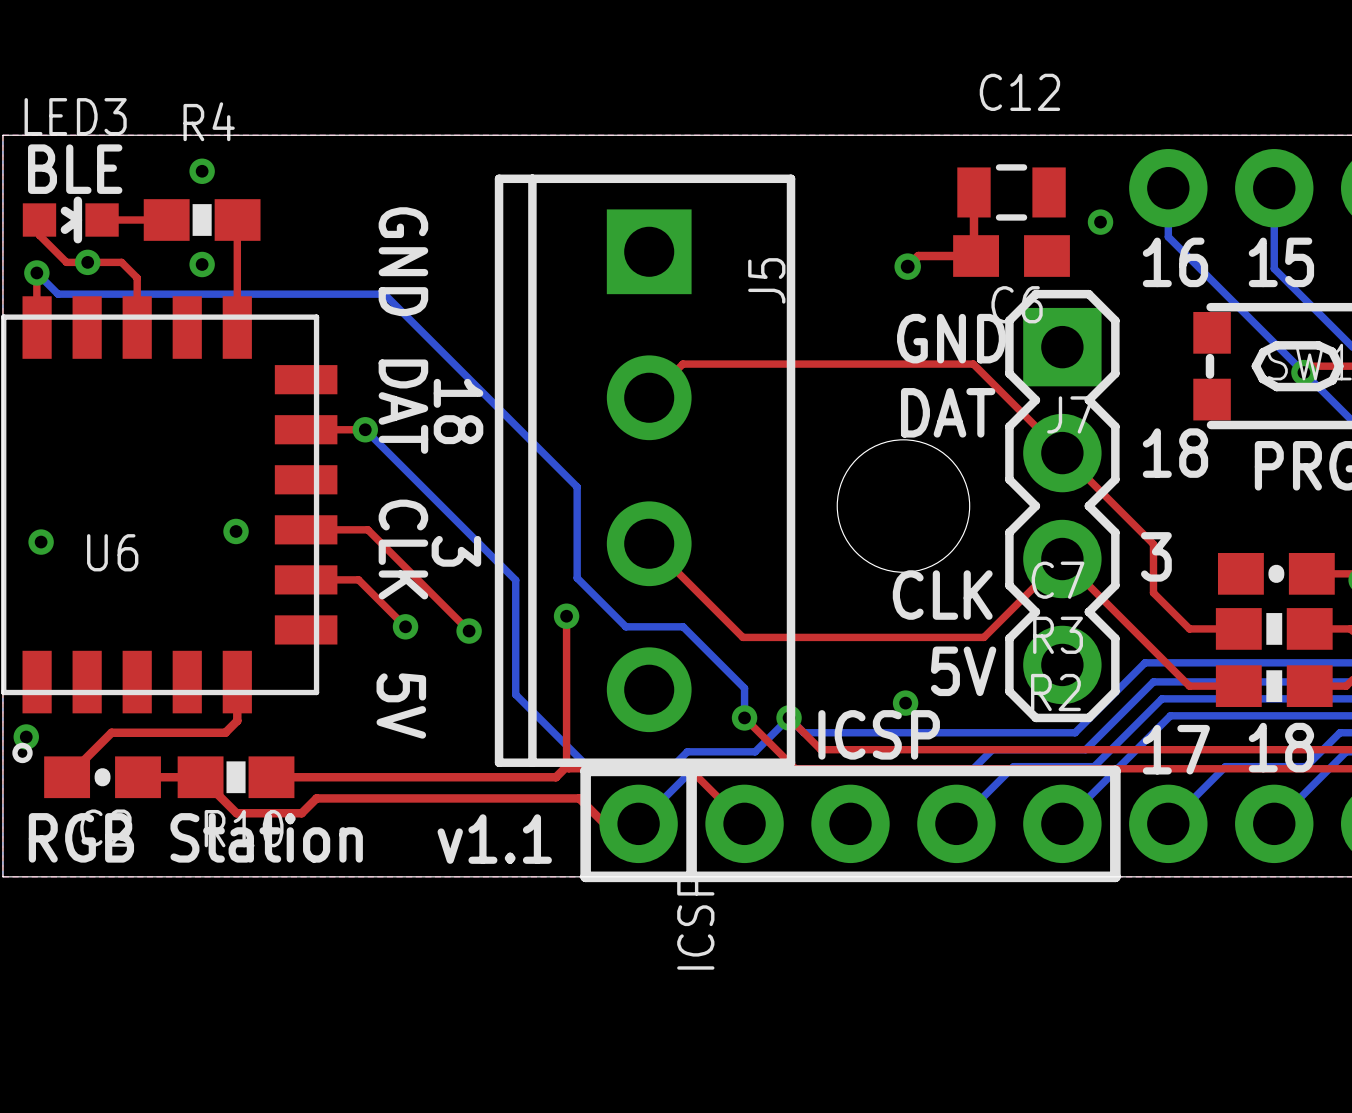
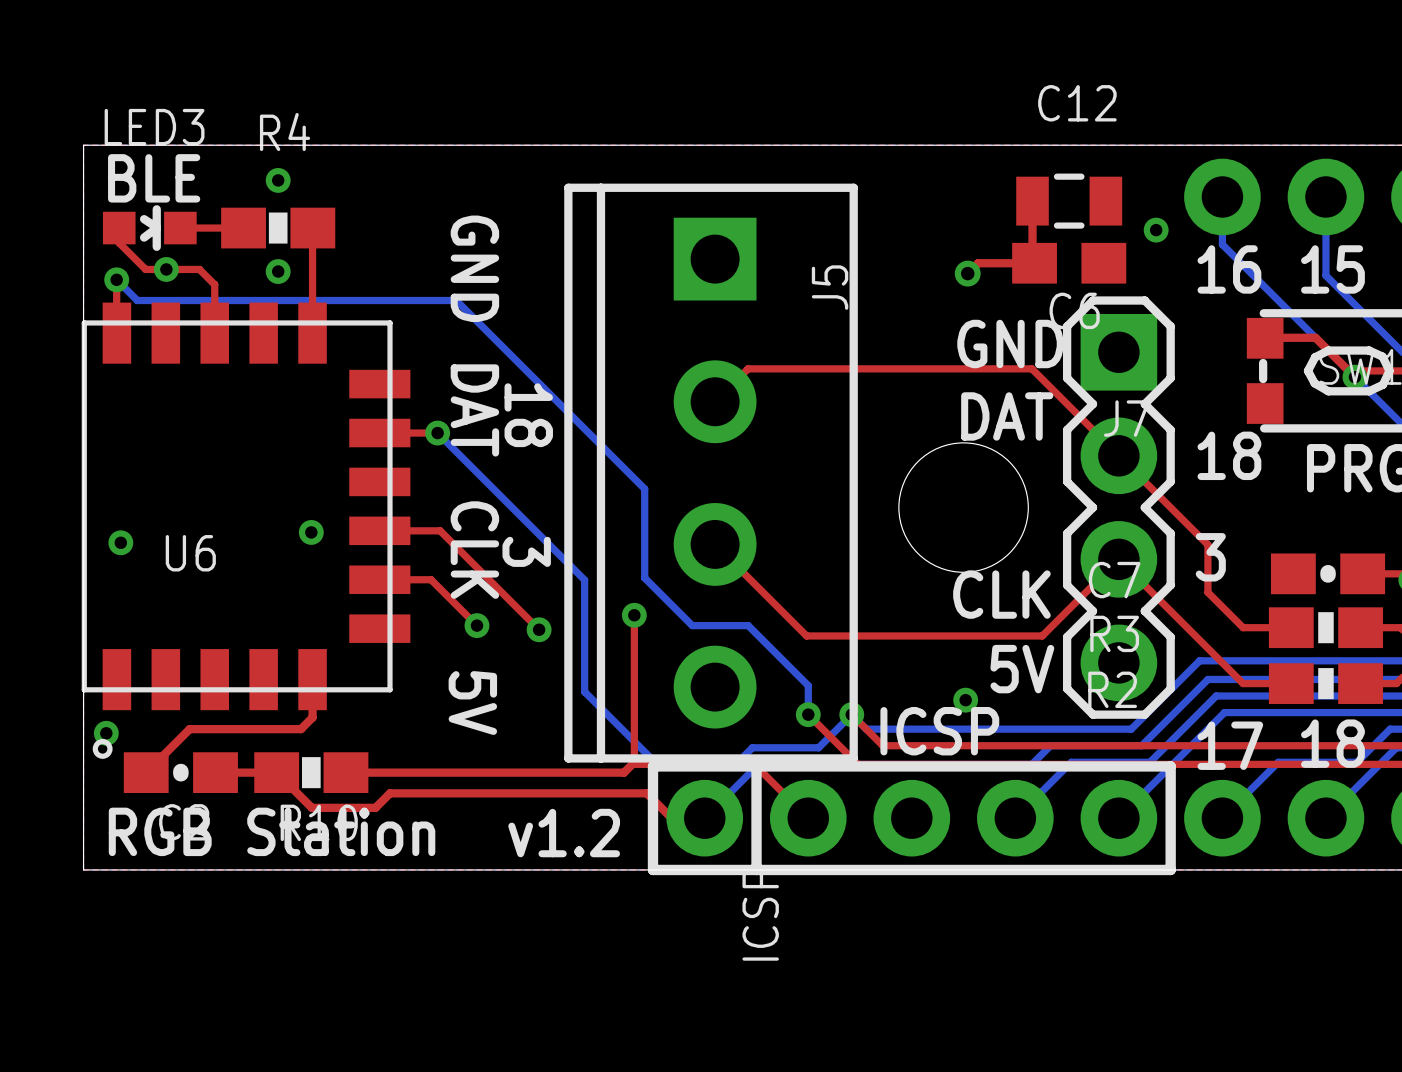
top track: none -> (1265, 337) (1315, 337) (1354, 377)
text: v1.1 (494, 839) -> v1.2 (564, 833)

